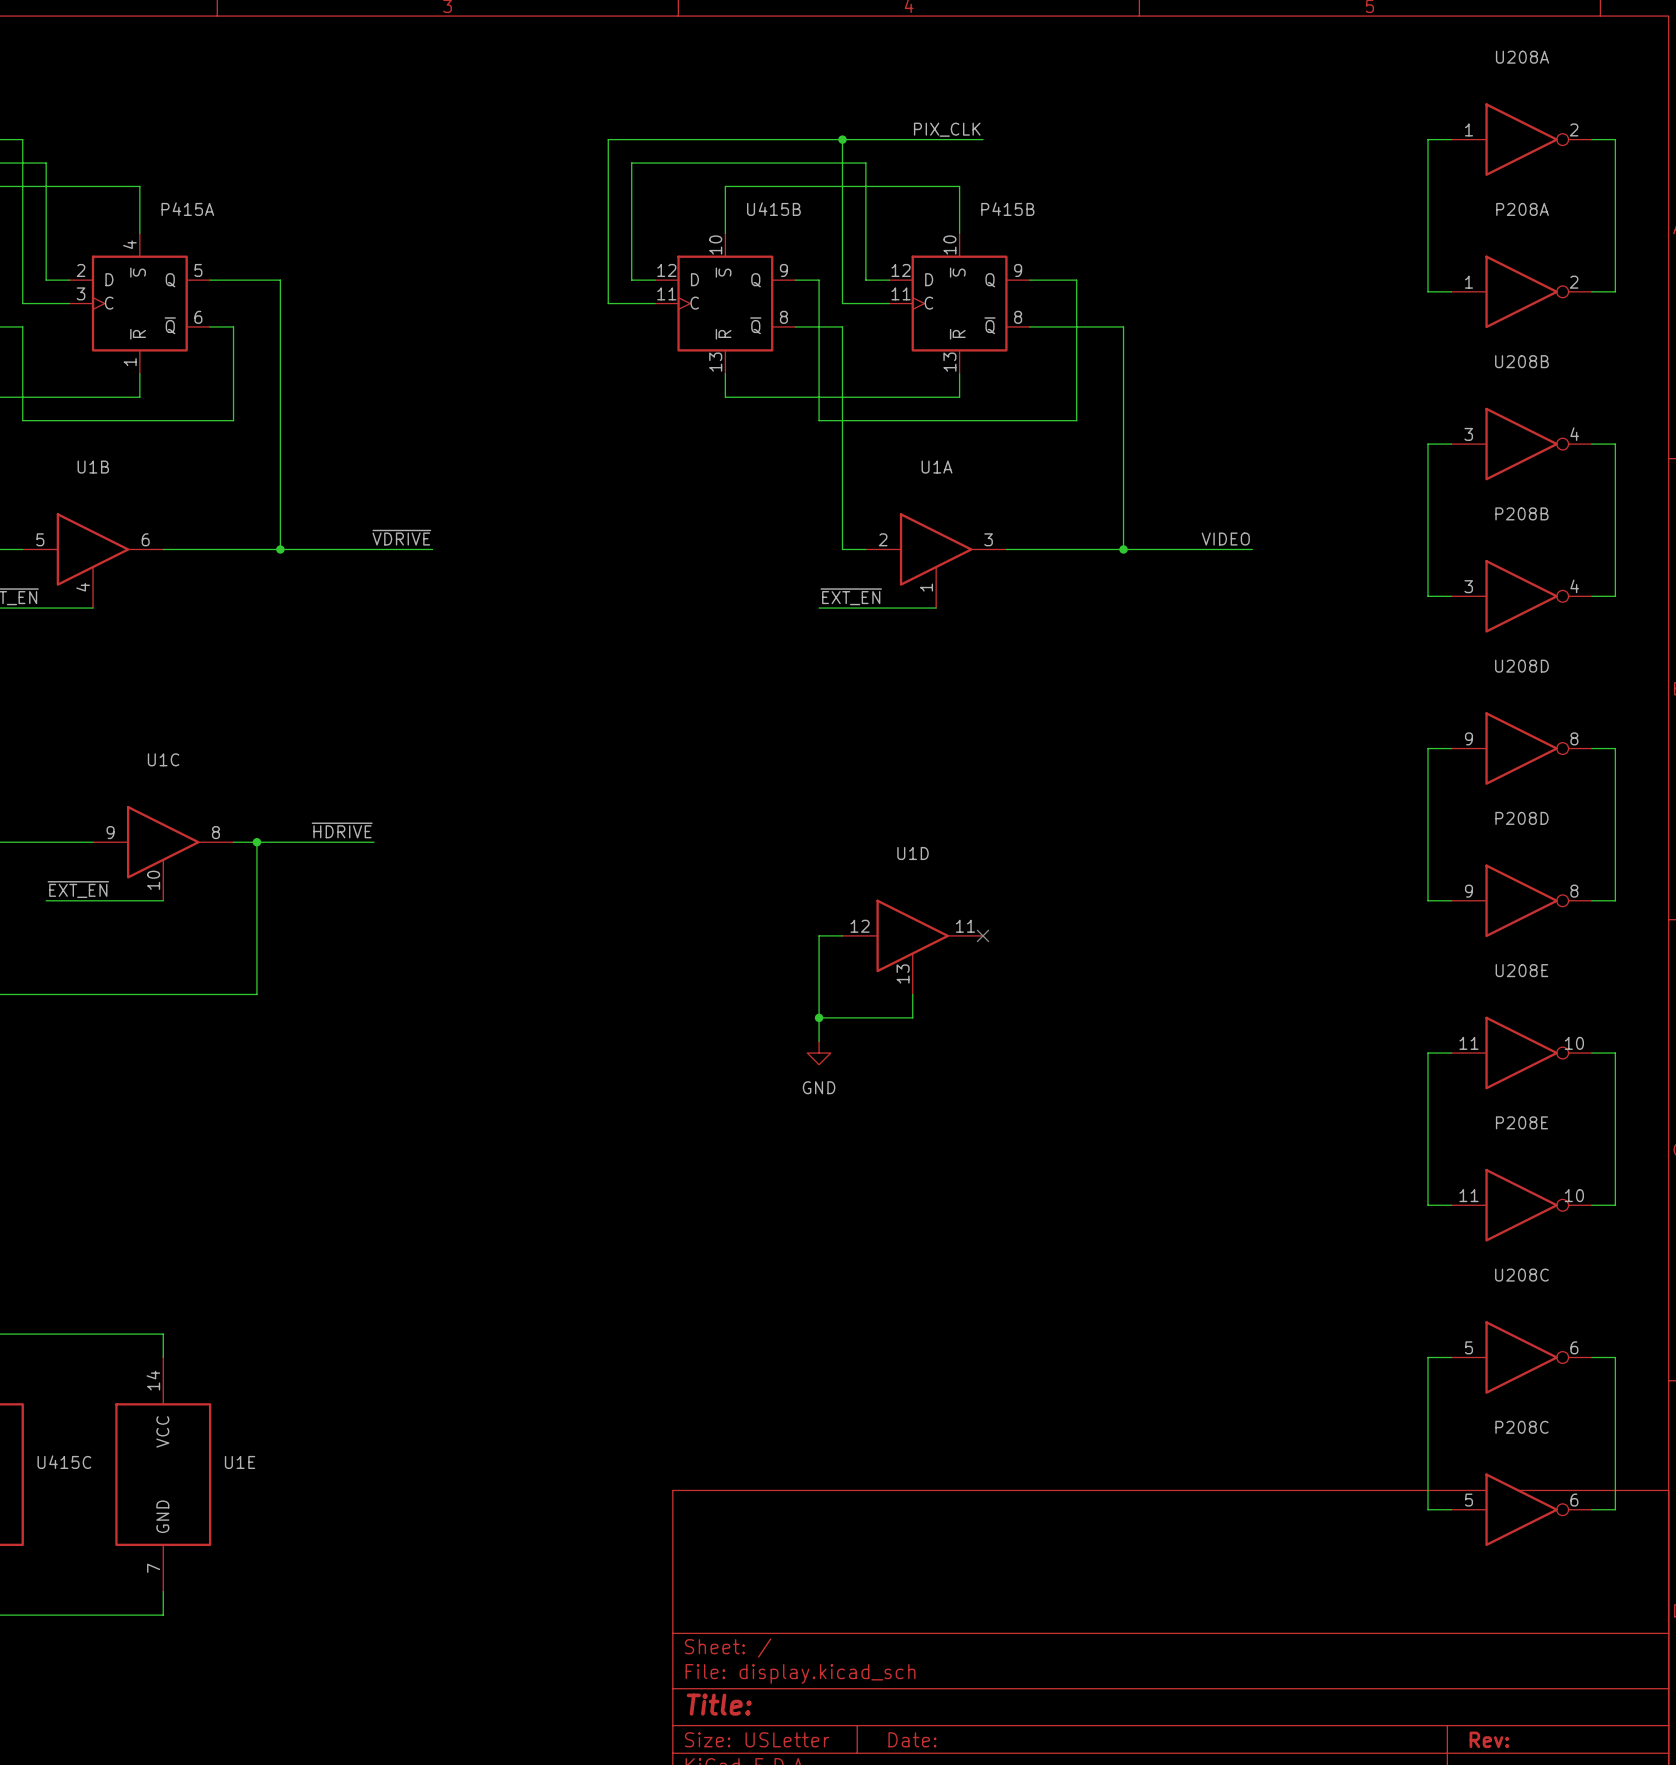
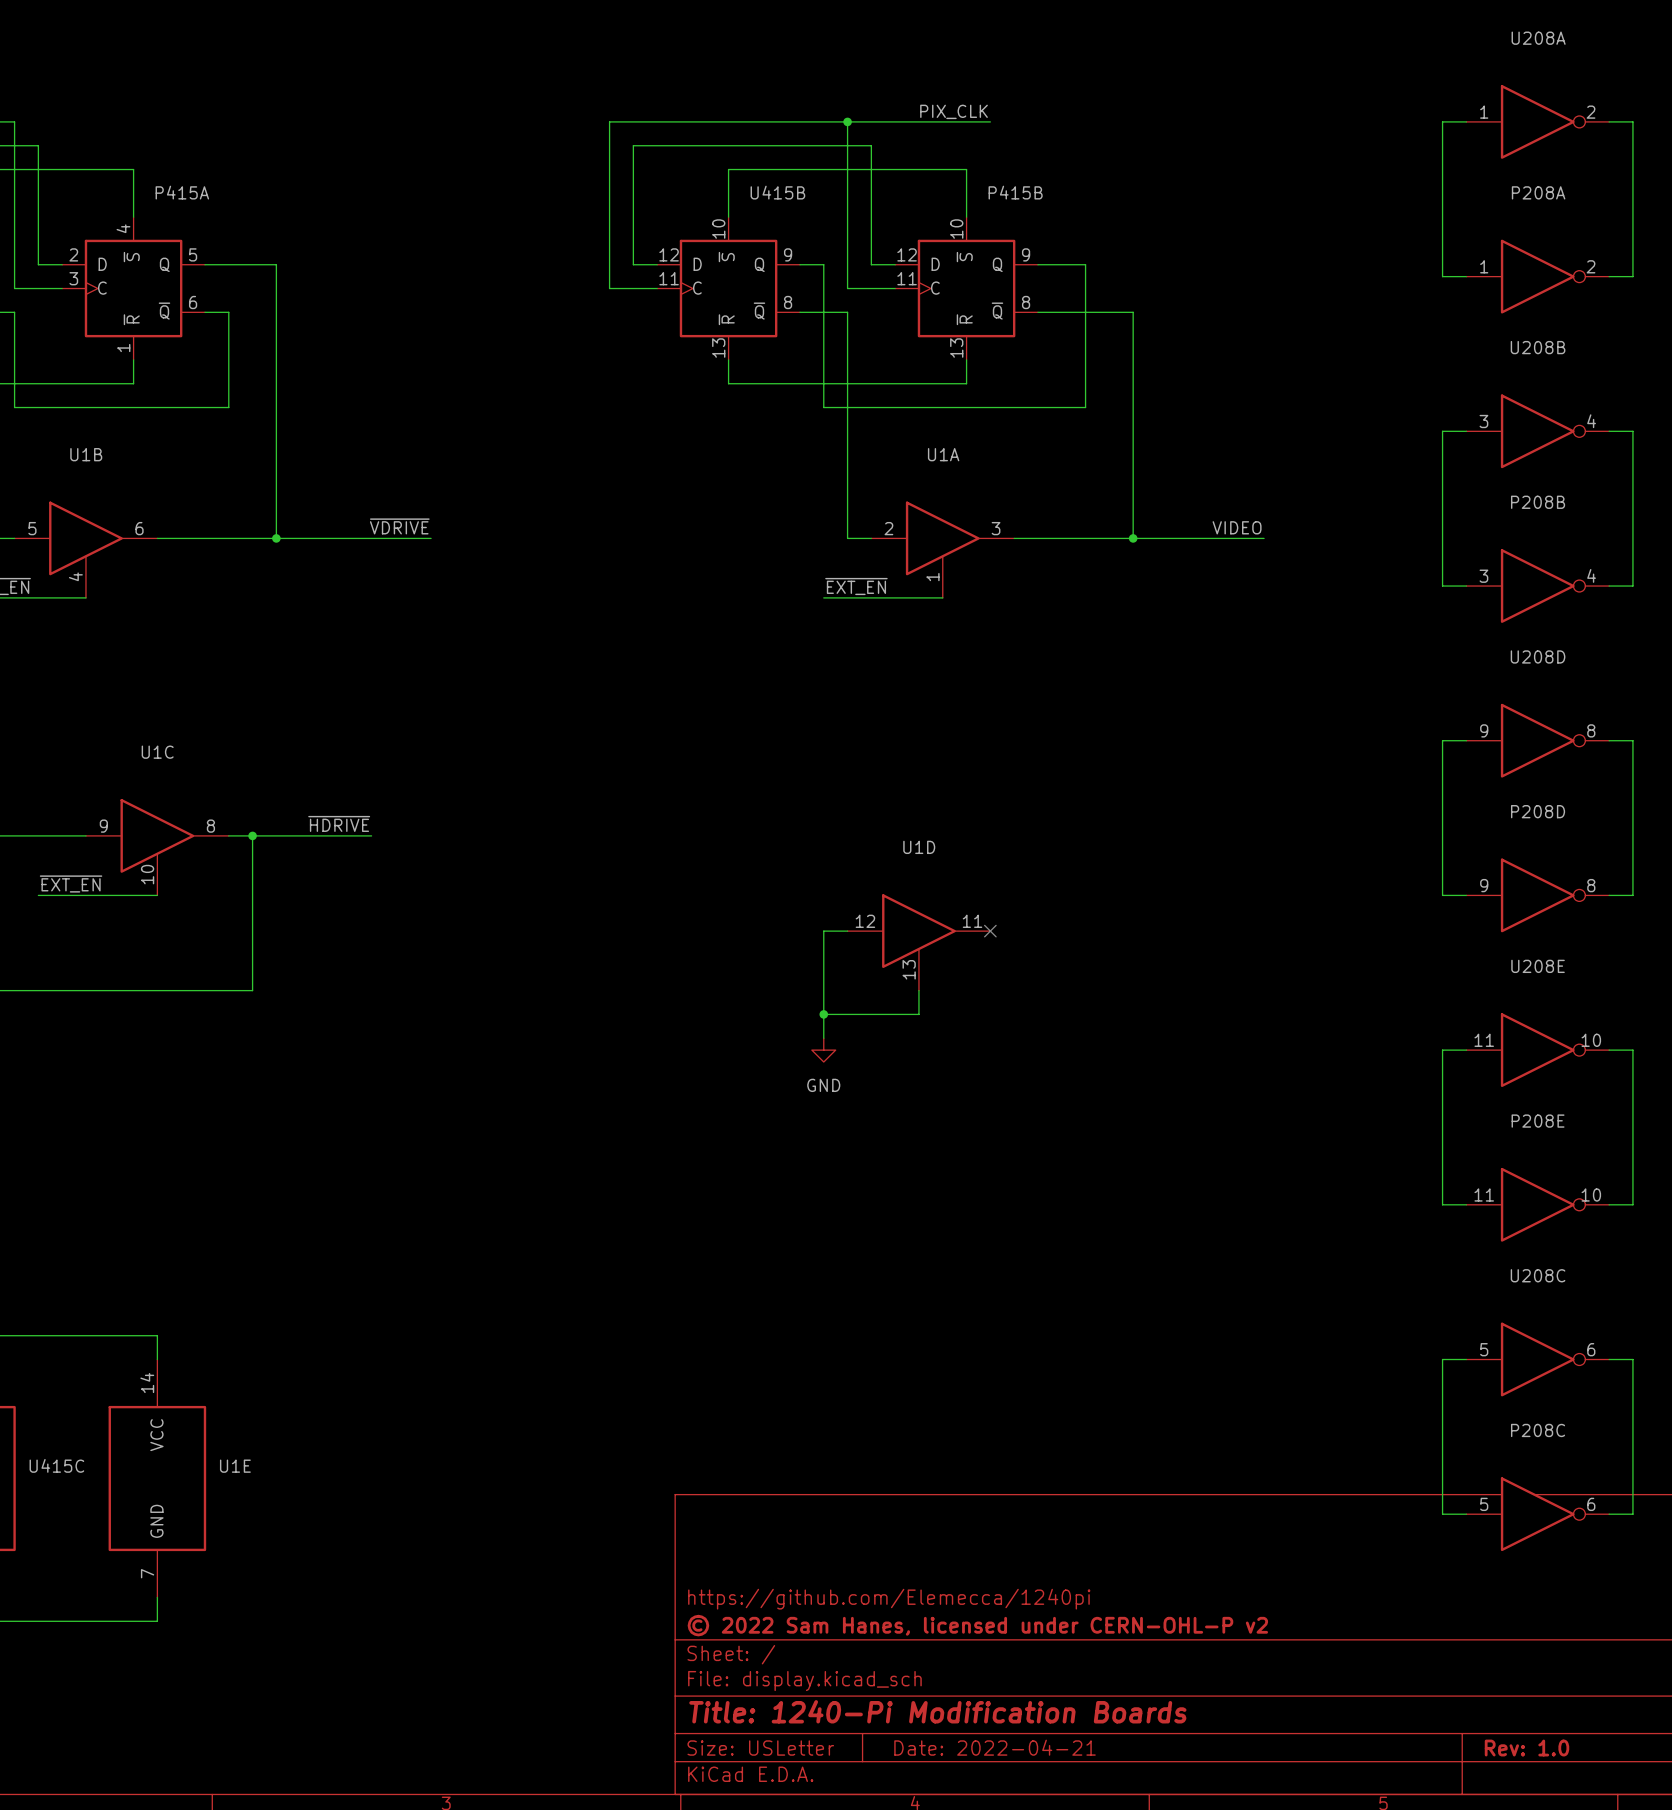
title block: none -> https://github.com/Elemecca/1240pi (889, 1599)
title block: none -> © 2022 Sam Hanes, licensed under CERN-OHL-P v2 (977, 1625)
title block: Title: (719, 1704) -> Title: 1240-Pi Modification Boards (937, 1711)
title block: Date: (912, 1739) -> Date: 2022-04-21 (995, 1747)
title block: Rev: (1489, 1739) -> Rev: 1.0 (1526, 1748)

